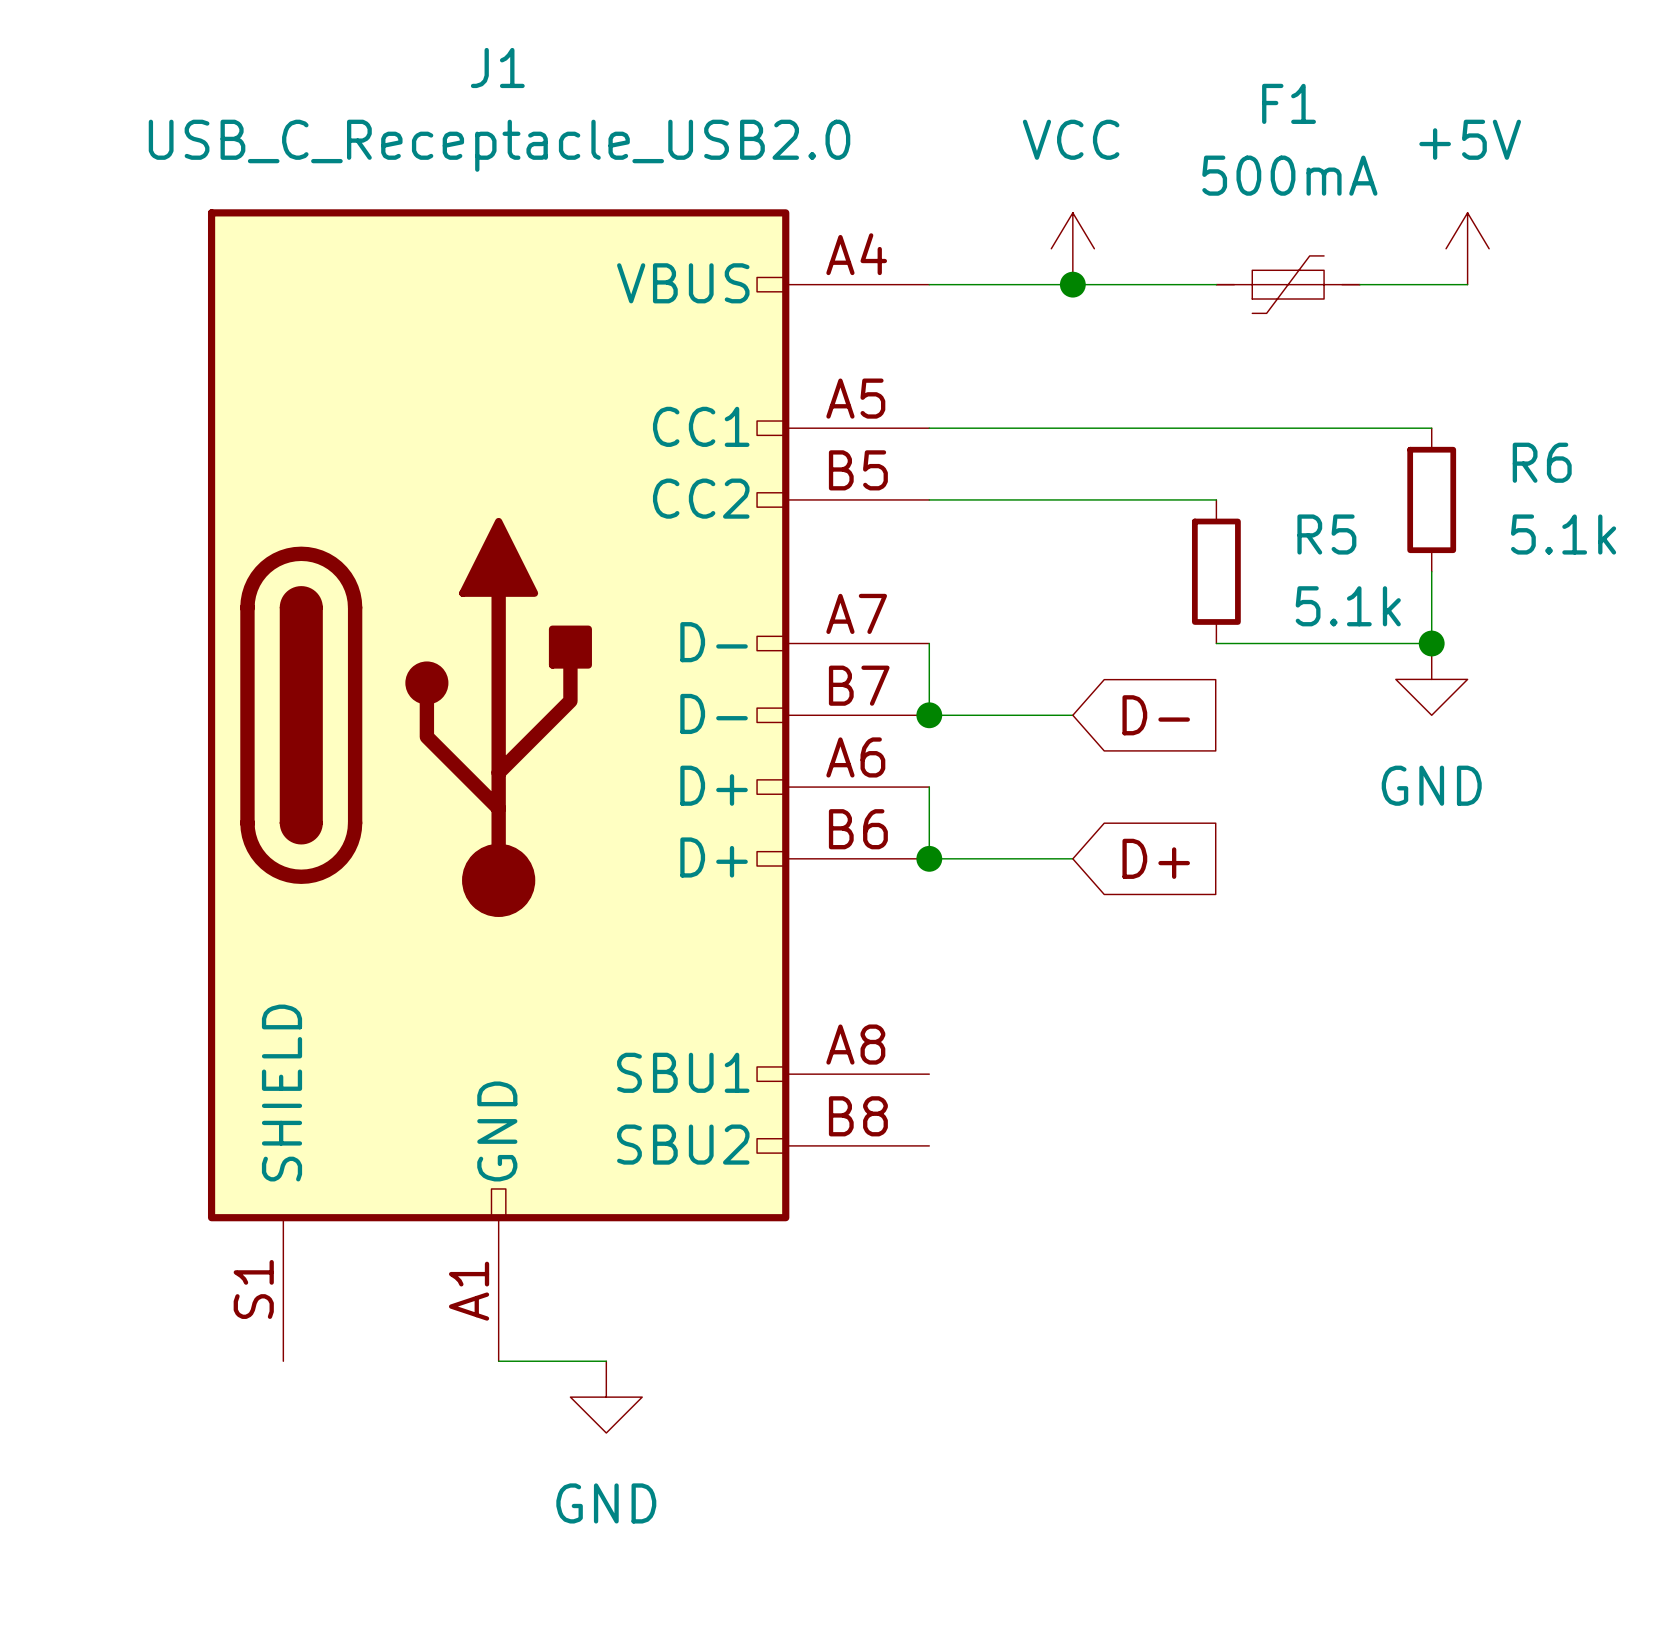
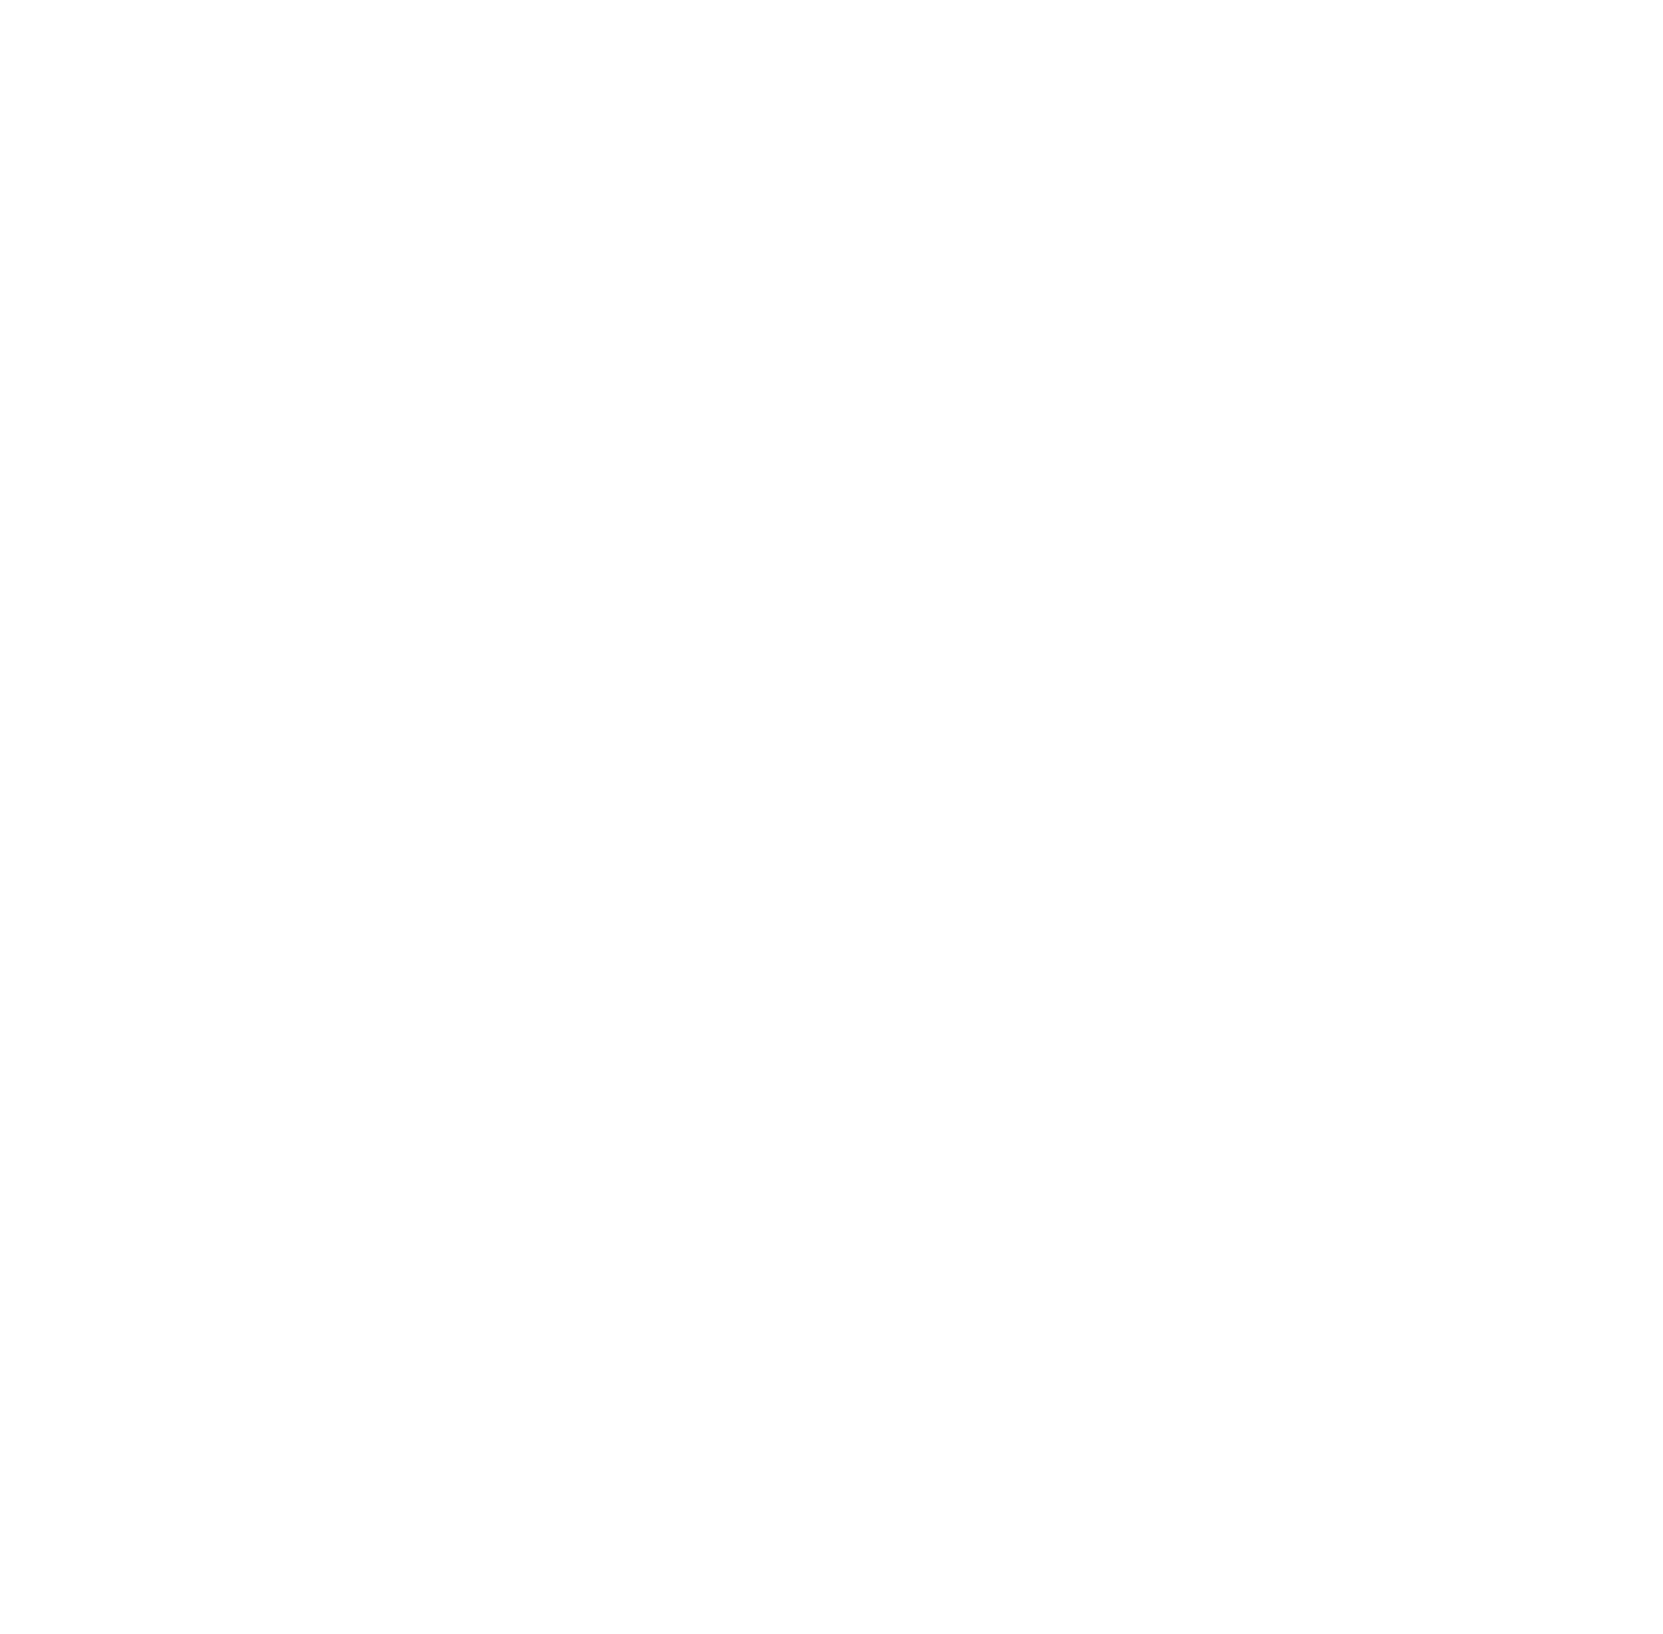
power symbol: VCC (1072, 248) -> none
power symbol: +5V (1467, 248) -> none
wire: (929, 284) (1216, 284) -> none
junction: (1072, 284) -> none
F1: 500mA (1288, 284) -> none
wire: (1359, 284) (1467, 284) -> none
wire: (929, 428) (1431, 428) -> none
wire: (929, 499) (1216, 499) -> none
R6: 5.1k (1431, 499) -> none
R5: 5.1k (1216, 571) -> none
wire: (1431, 571) (1431, 643) (1216, 643) -> none
wire: (929, 643) (929, 715) (1072, 715) -> none
junction: (1431, 643) -> none
power symbol: GND (1431, 679) -> none
junction: (929, 715) -> none
global label: D- (1156, 715) -> none
J1: USB_C_Receptacle_USB2.0 (568, 785) -> none
wire: (929, 787) (929, 858) (1072, 858) -> none
junction: (929, 858) -> none
global label: D+ (1156, 858) -> none
wire: (498, 1361) (606, 1361) -> none
power symbol: GND (606, 1397) -> none

